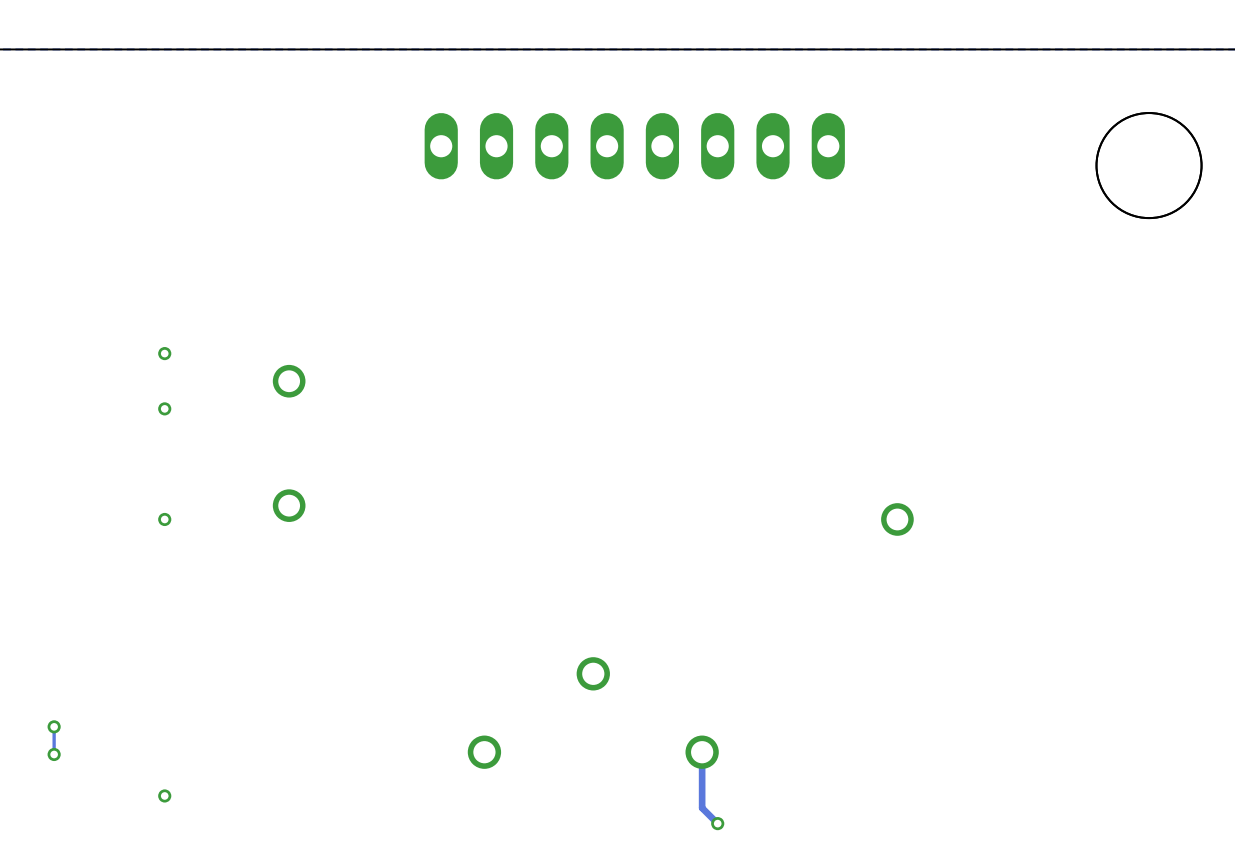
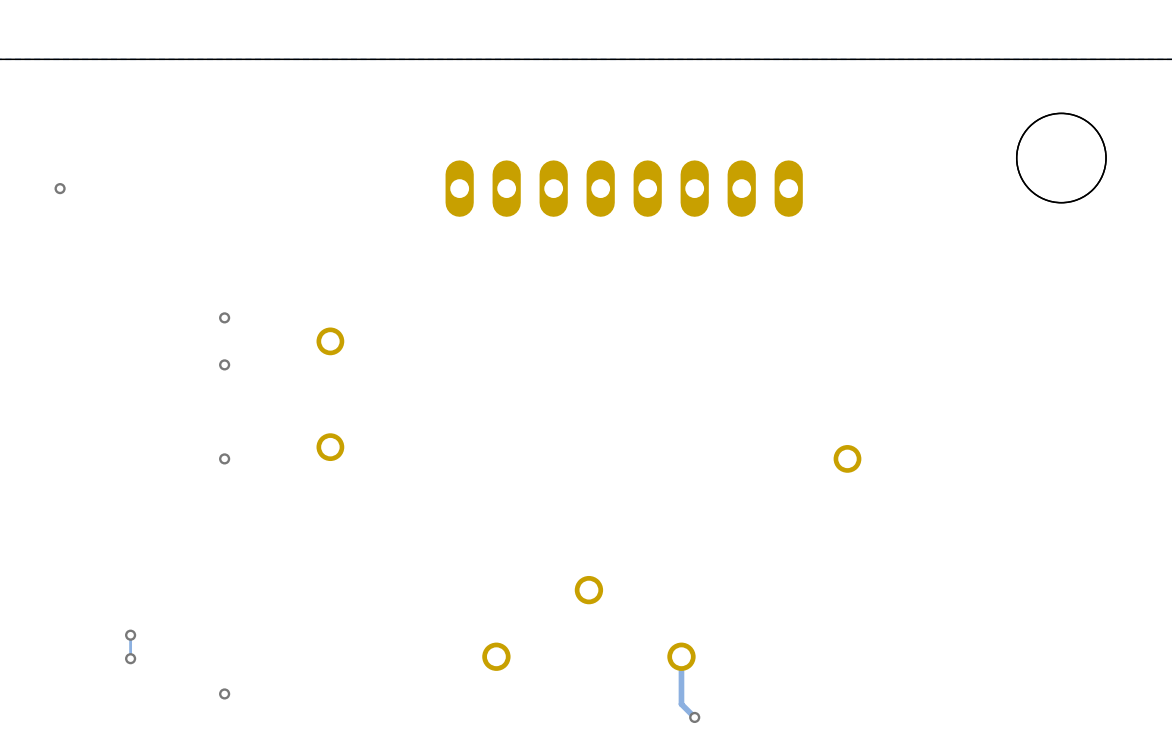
part position: (634, 146) -> (624, 188)

